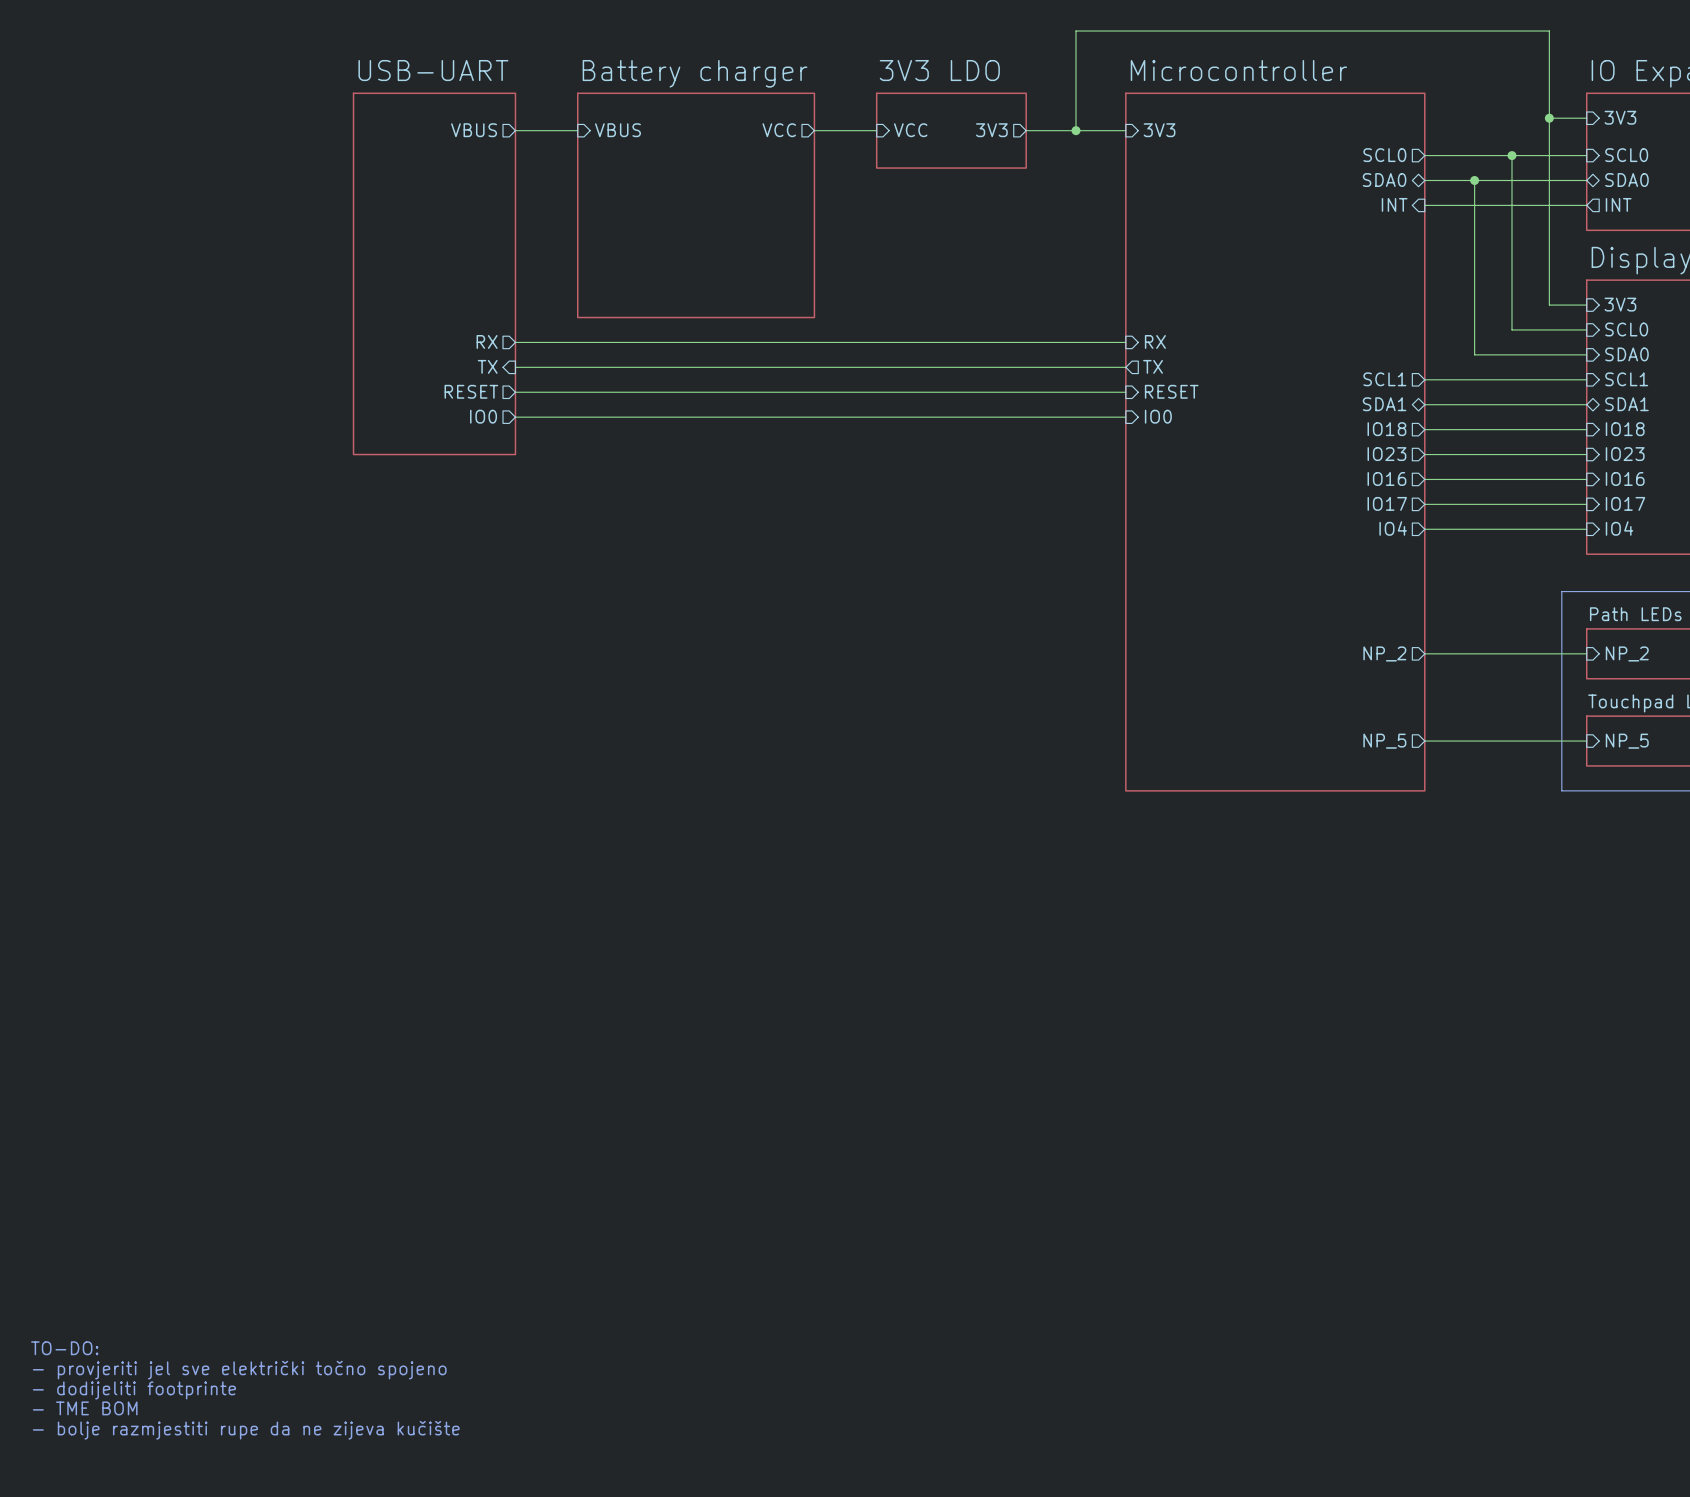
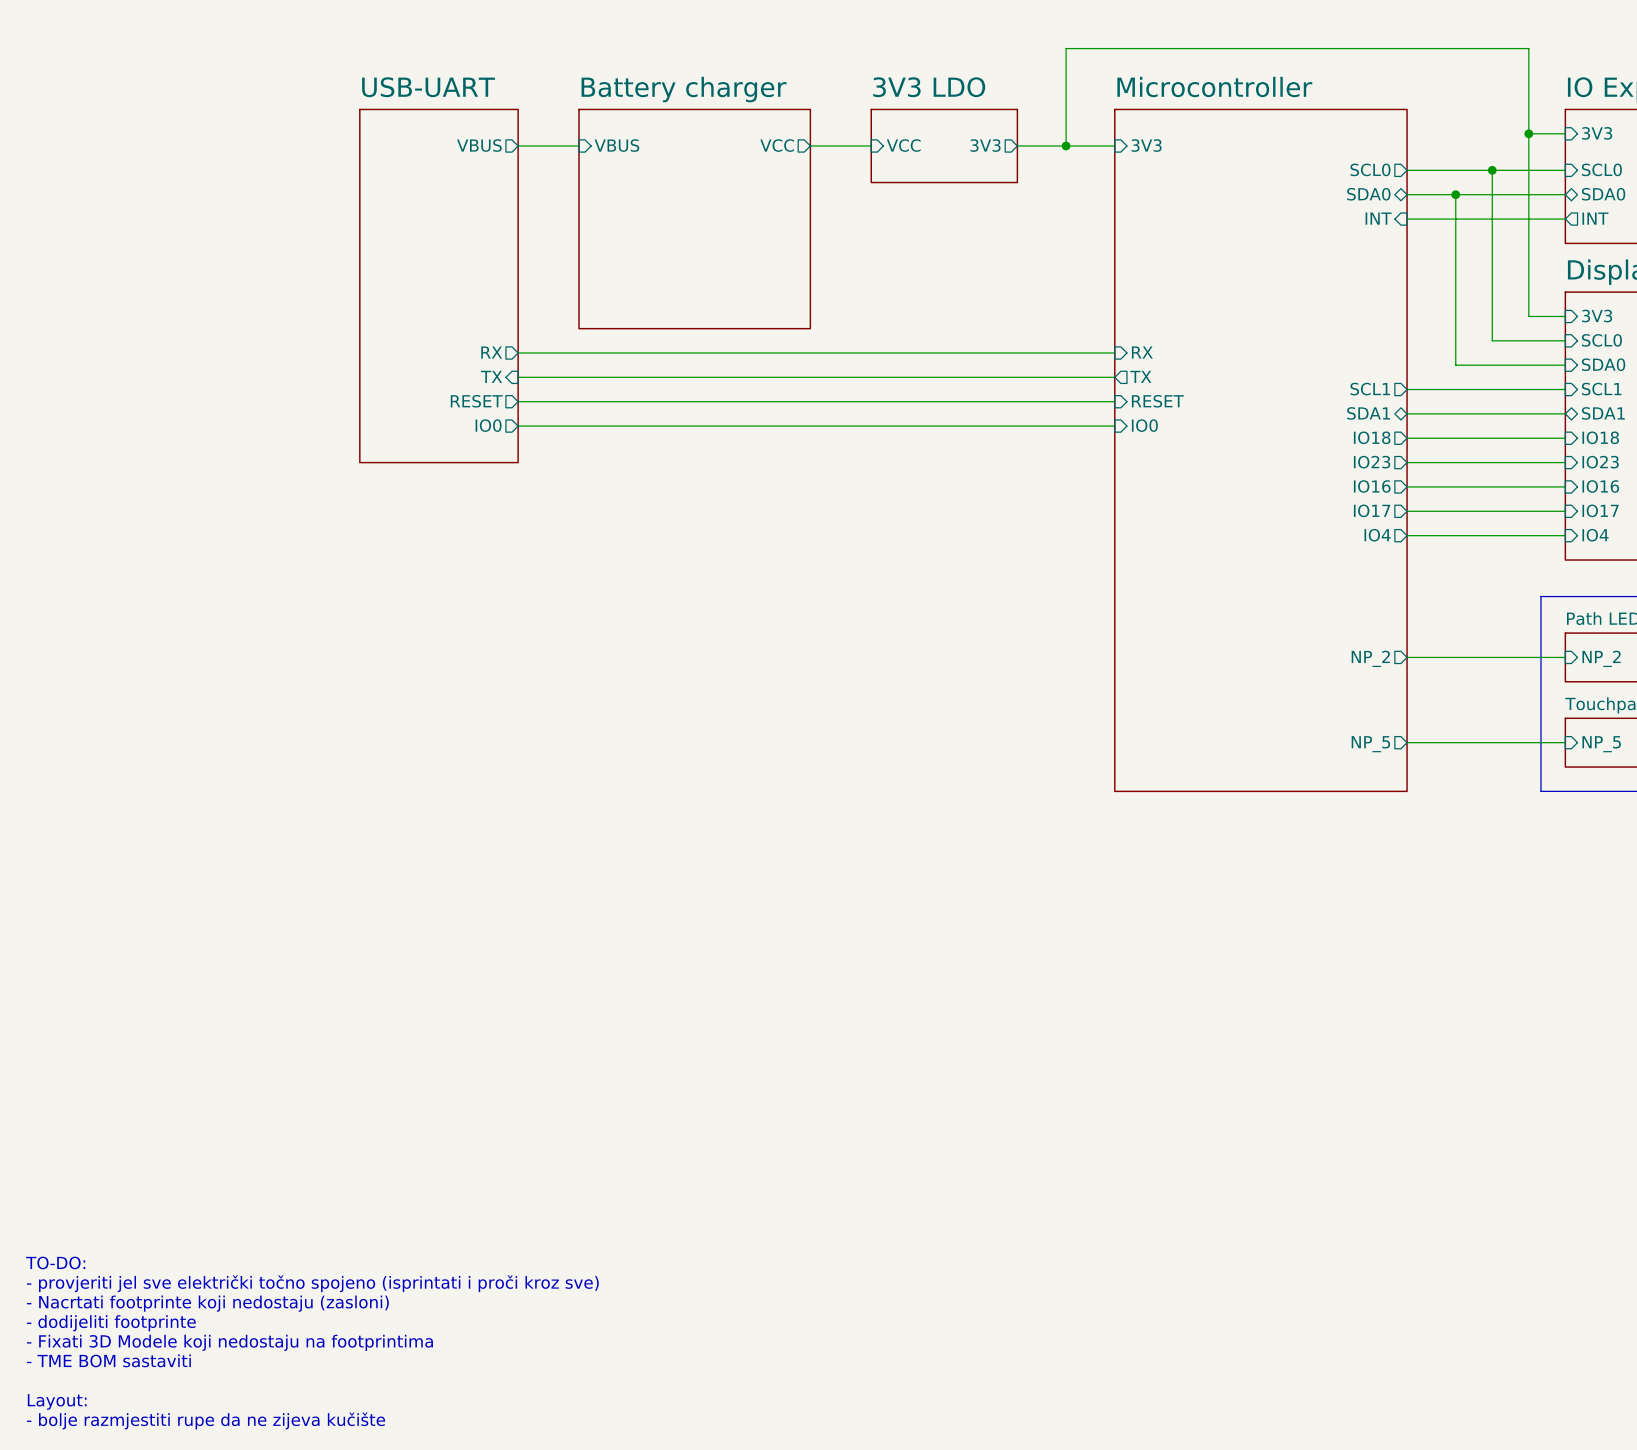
text: none -> - provjeriti jel sve električki točno spojeno (isprintati i proči kroz sve) (312, 1283)
text: none -> - Nacrtati footprinte koji nedostaju (zasloni) (207, 1303)
text position: TO-DO: (64, 1348) -> TO-DO: (55, 1262)
text: none -> - Fixati 3D Modele koji nedostaju na footprintima (229, 1342)
text: - provjeriti jel sve električki točno spojeno (239, 1370) -> none
text: none -> - TME BOM sastaviti (108, 1360)
text position: - dodijeliti footprinte (134, 1390) -> - dodijeliti footprinte (111, 1323)
text: - TME BOM (85, 1408) -> none
text: none -> Layout: (57, 1401)
text position: - bolje razmjestiti rupe da ne zijeva kučište (246, 1430) -> - bolje razmjestiti rupe da ne zijeva kučište (206, 1420)

